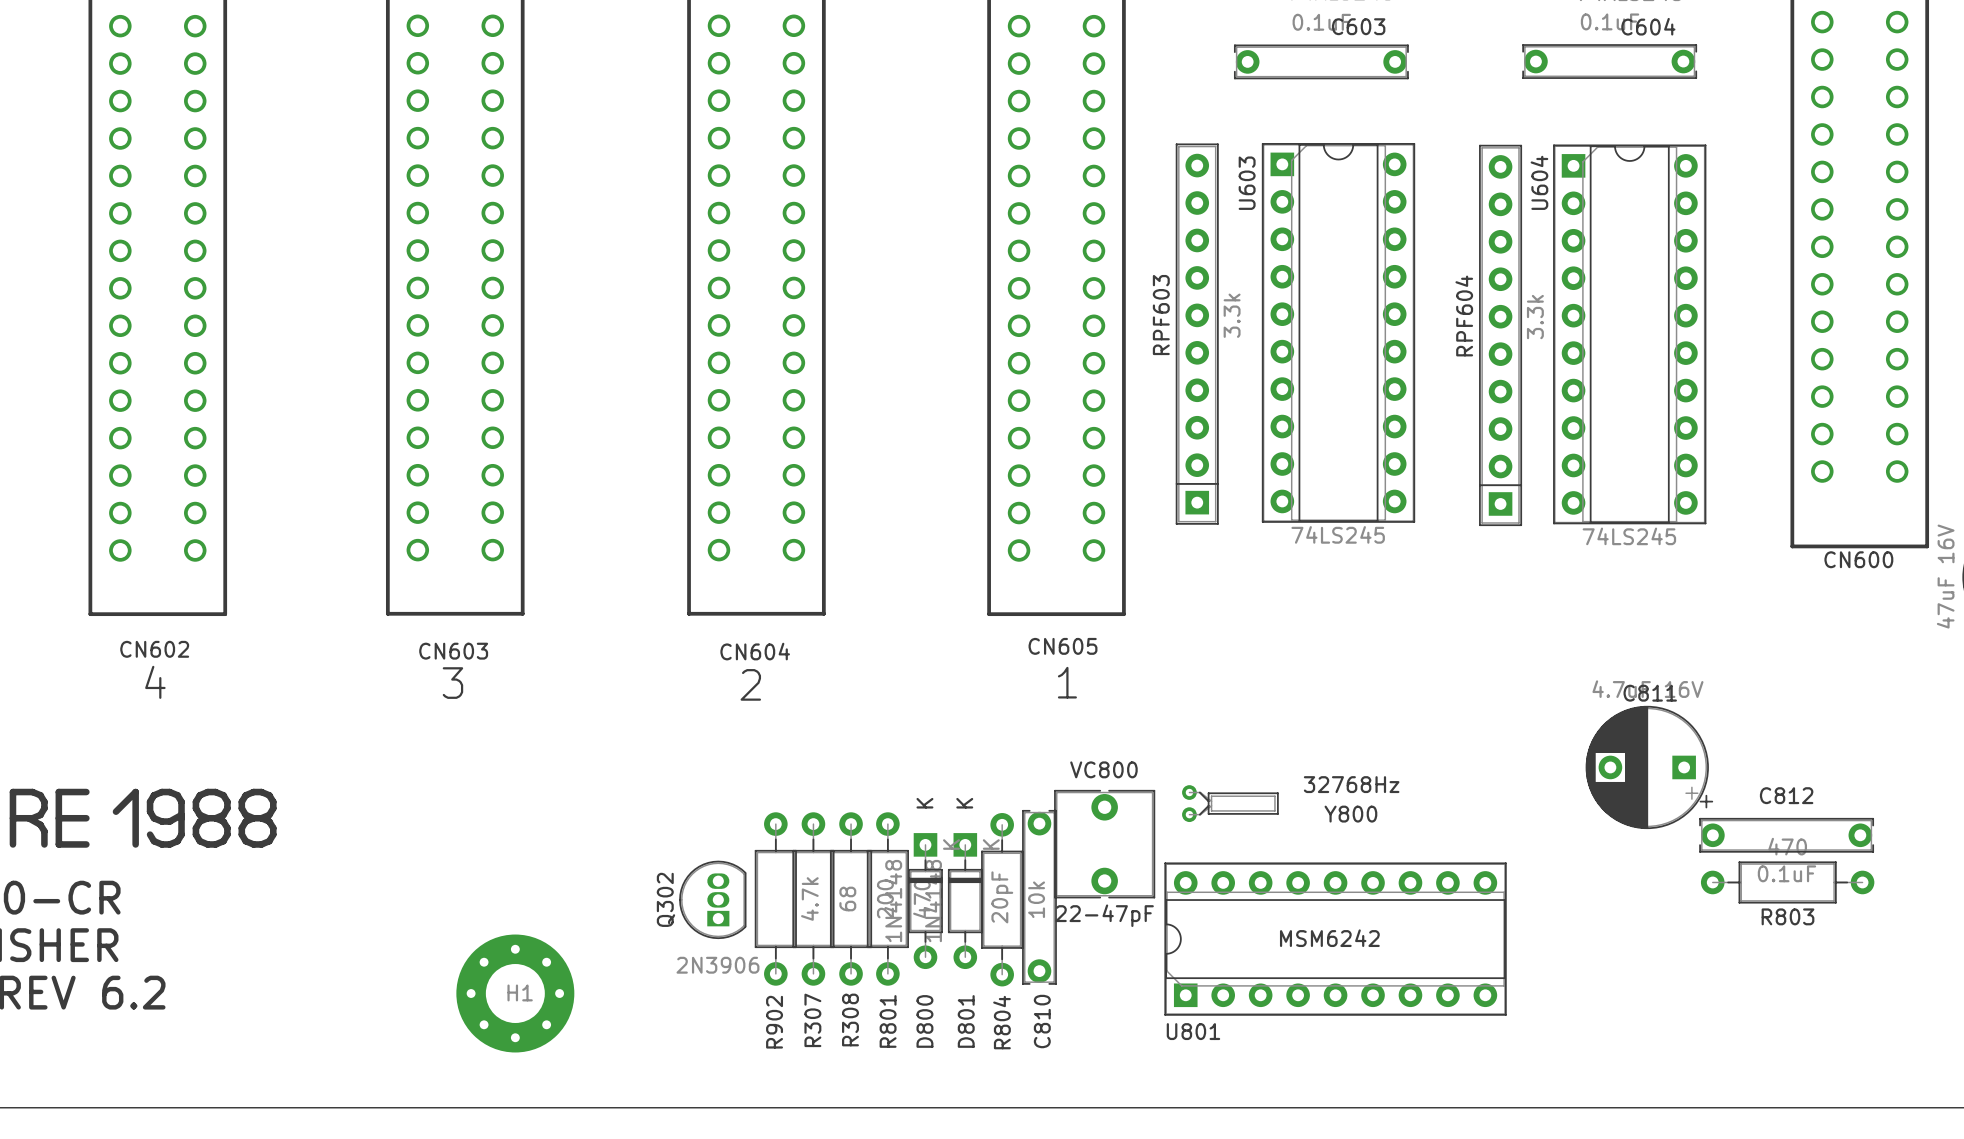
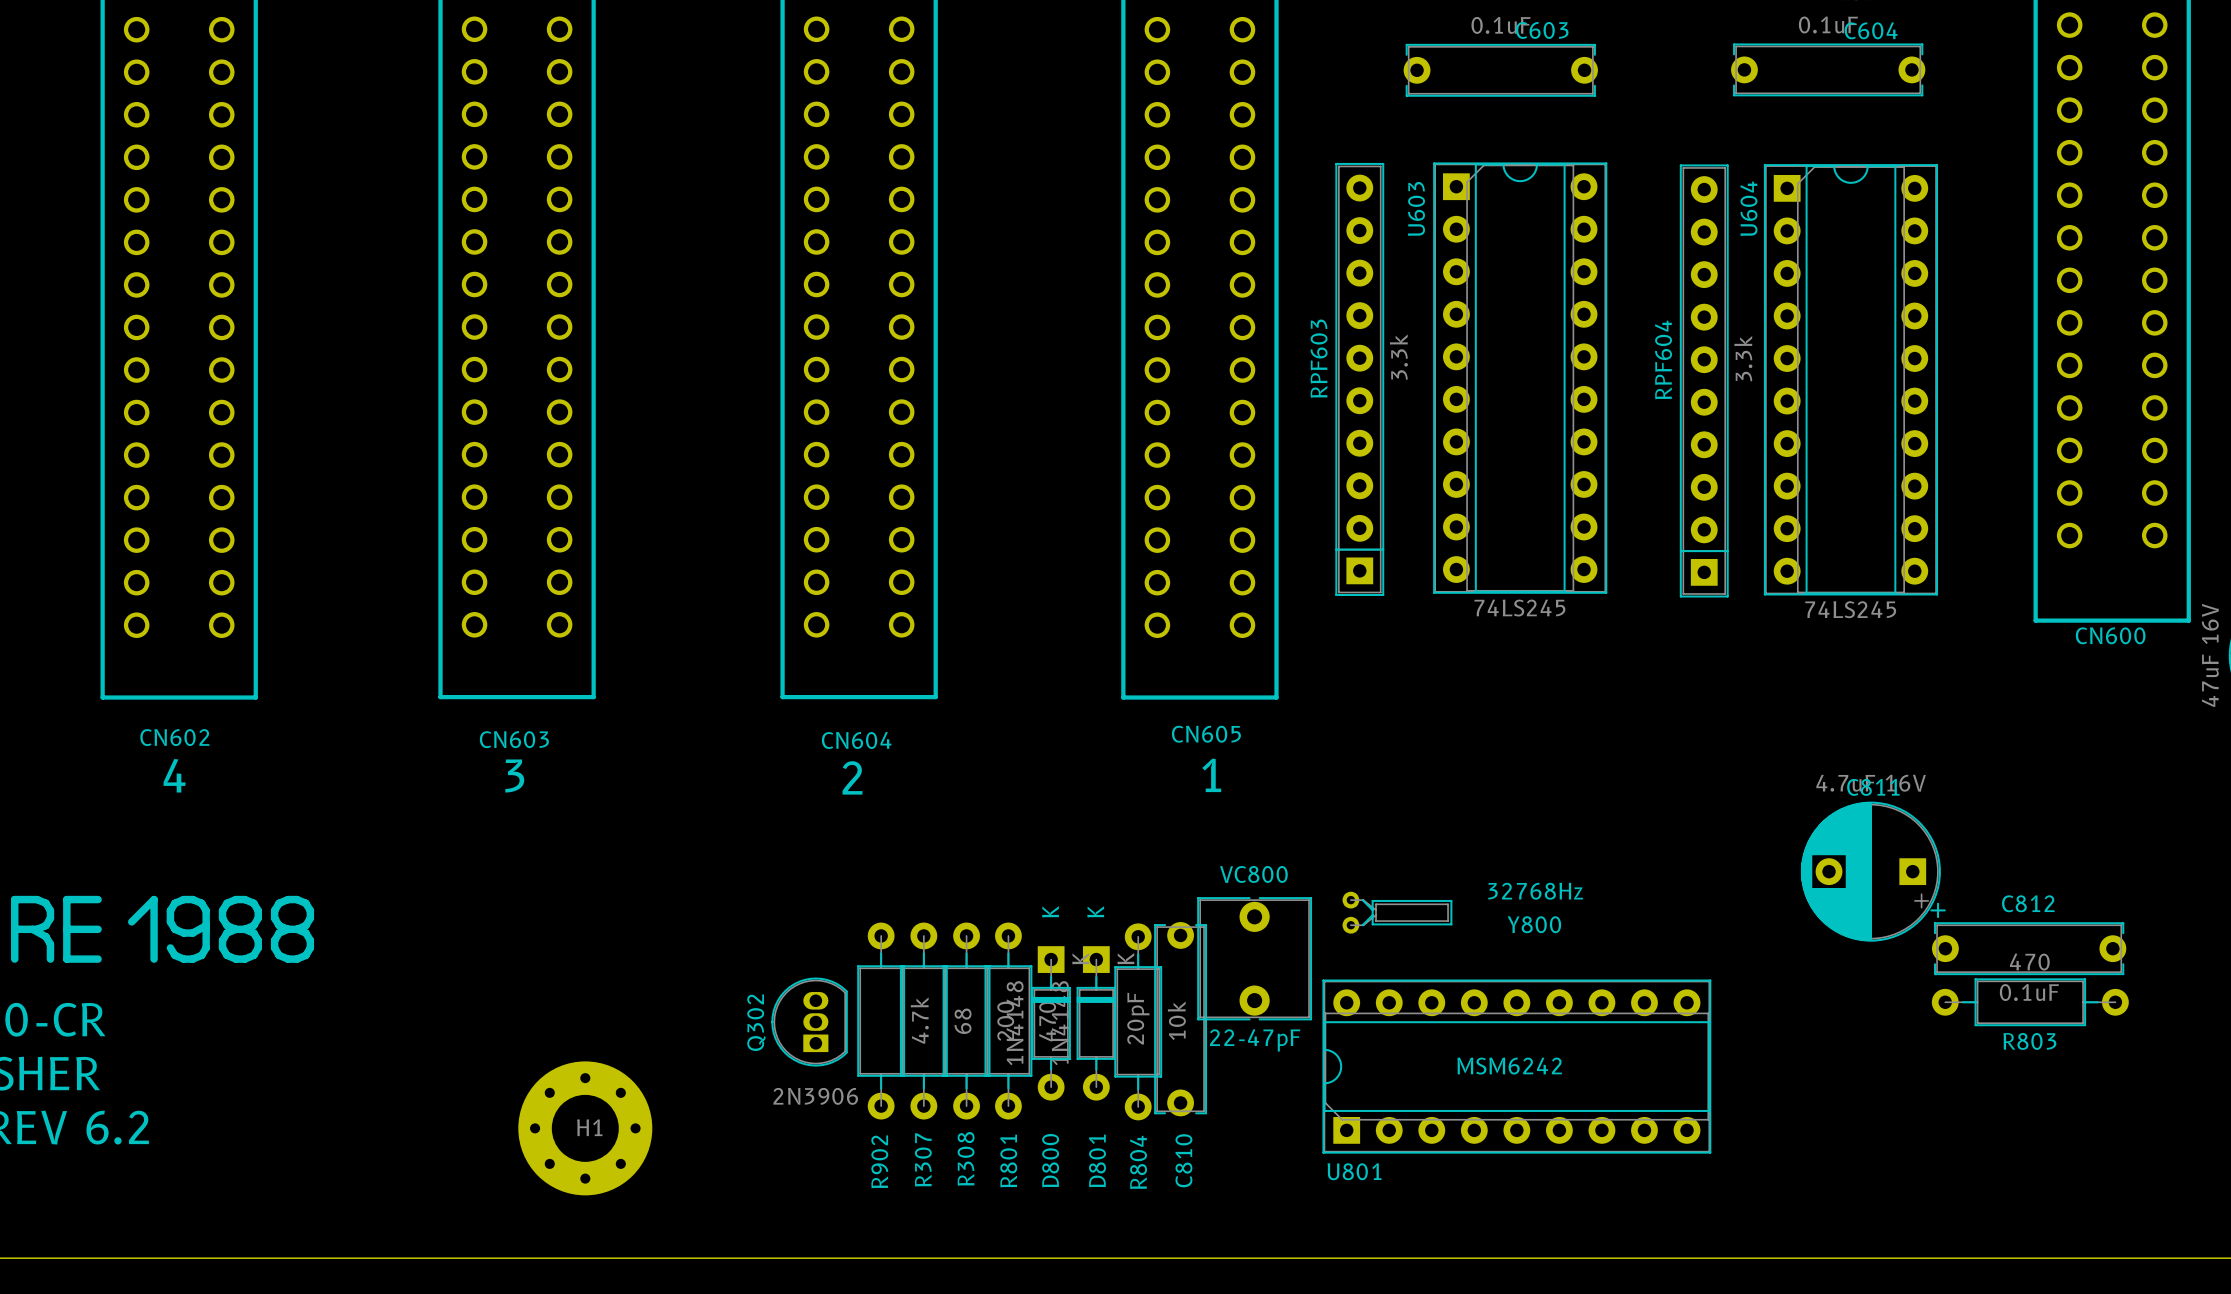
C603 footprint: [1233, 44, 1409, 80] -> [1403, 43, 1598, 97]
C604 footprint: [1522, 44, 1698, 79] -> [1731, 43, 1926, 97]
C810 footprint: [1022, 809, 1057, 985] -> [1154, 922, 1208, 1117]
C812 footprint: [1699, 817, 1875, 853] -> [1932, 922, 2127, 976]

